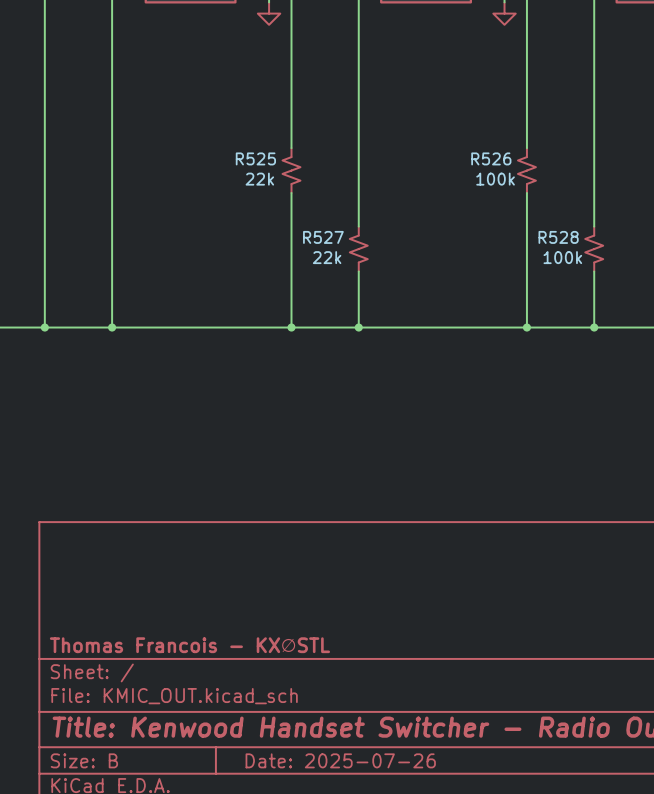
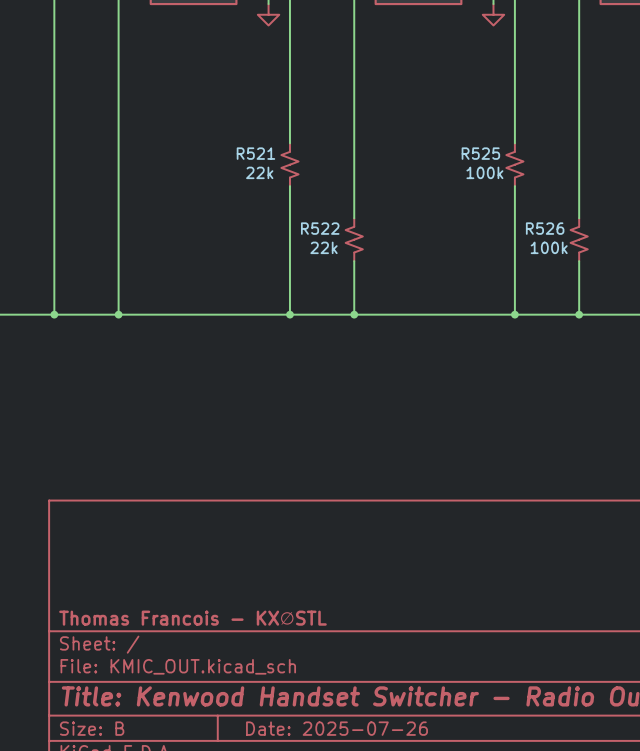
R525 name: R525 (255, 158) -> R521 (255, 153)
R526 name: R526 (491, 158) -> R525 (480, 153)
R527 name: R527 (323, 237) -> R522 (320, 228)
R528 name: R528 (558, 237) -> R526 (545, 228)

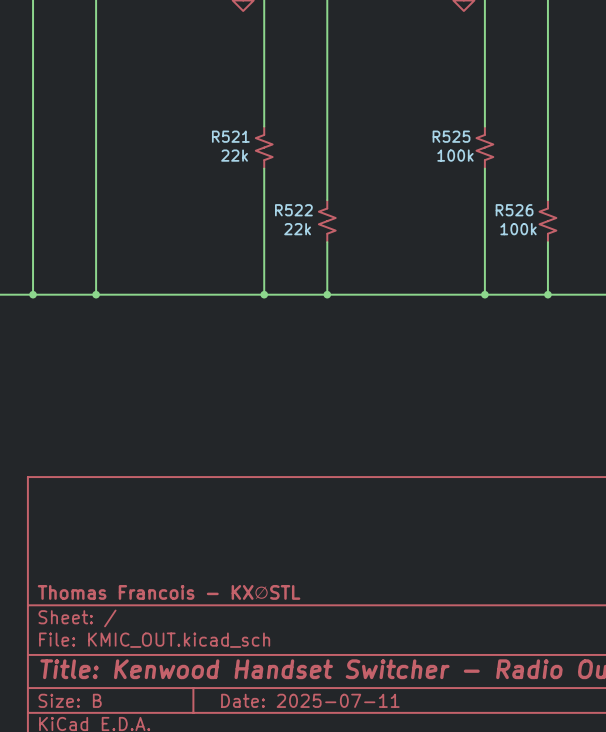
title block: Date: 2025-07-26 (337, 728) -> Date: 2025-07-11 (310, 700)

